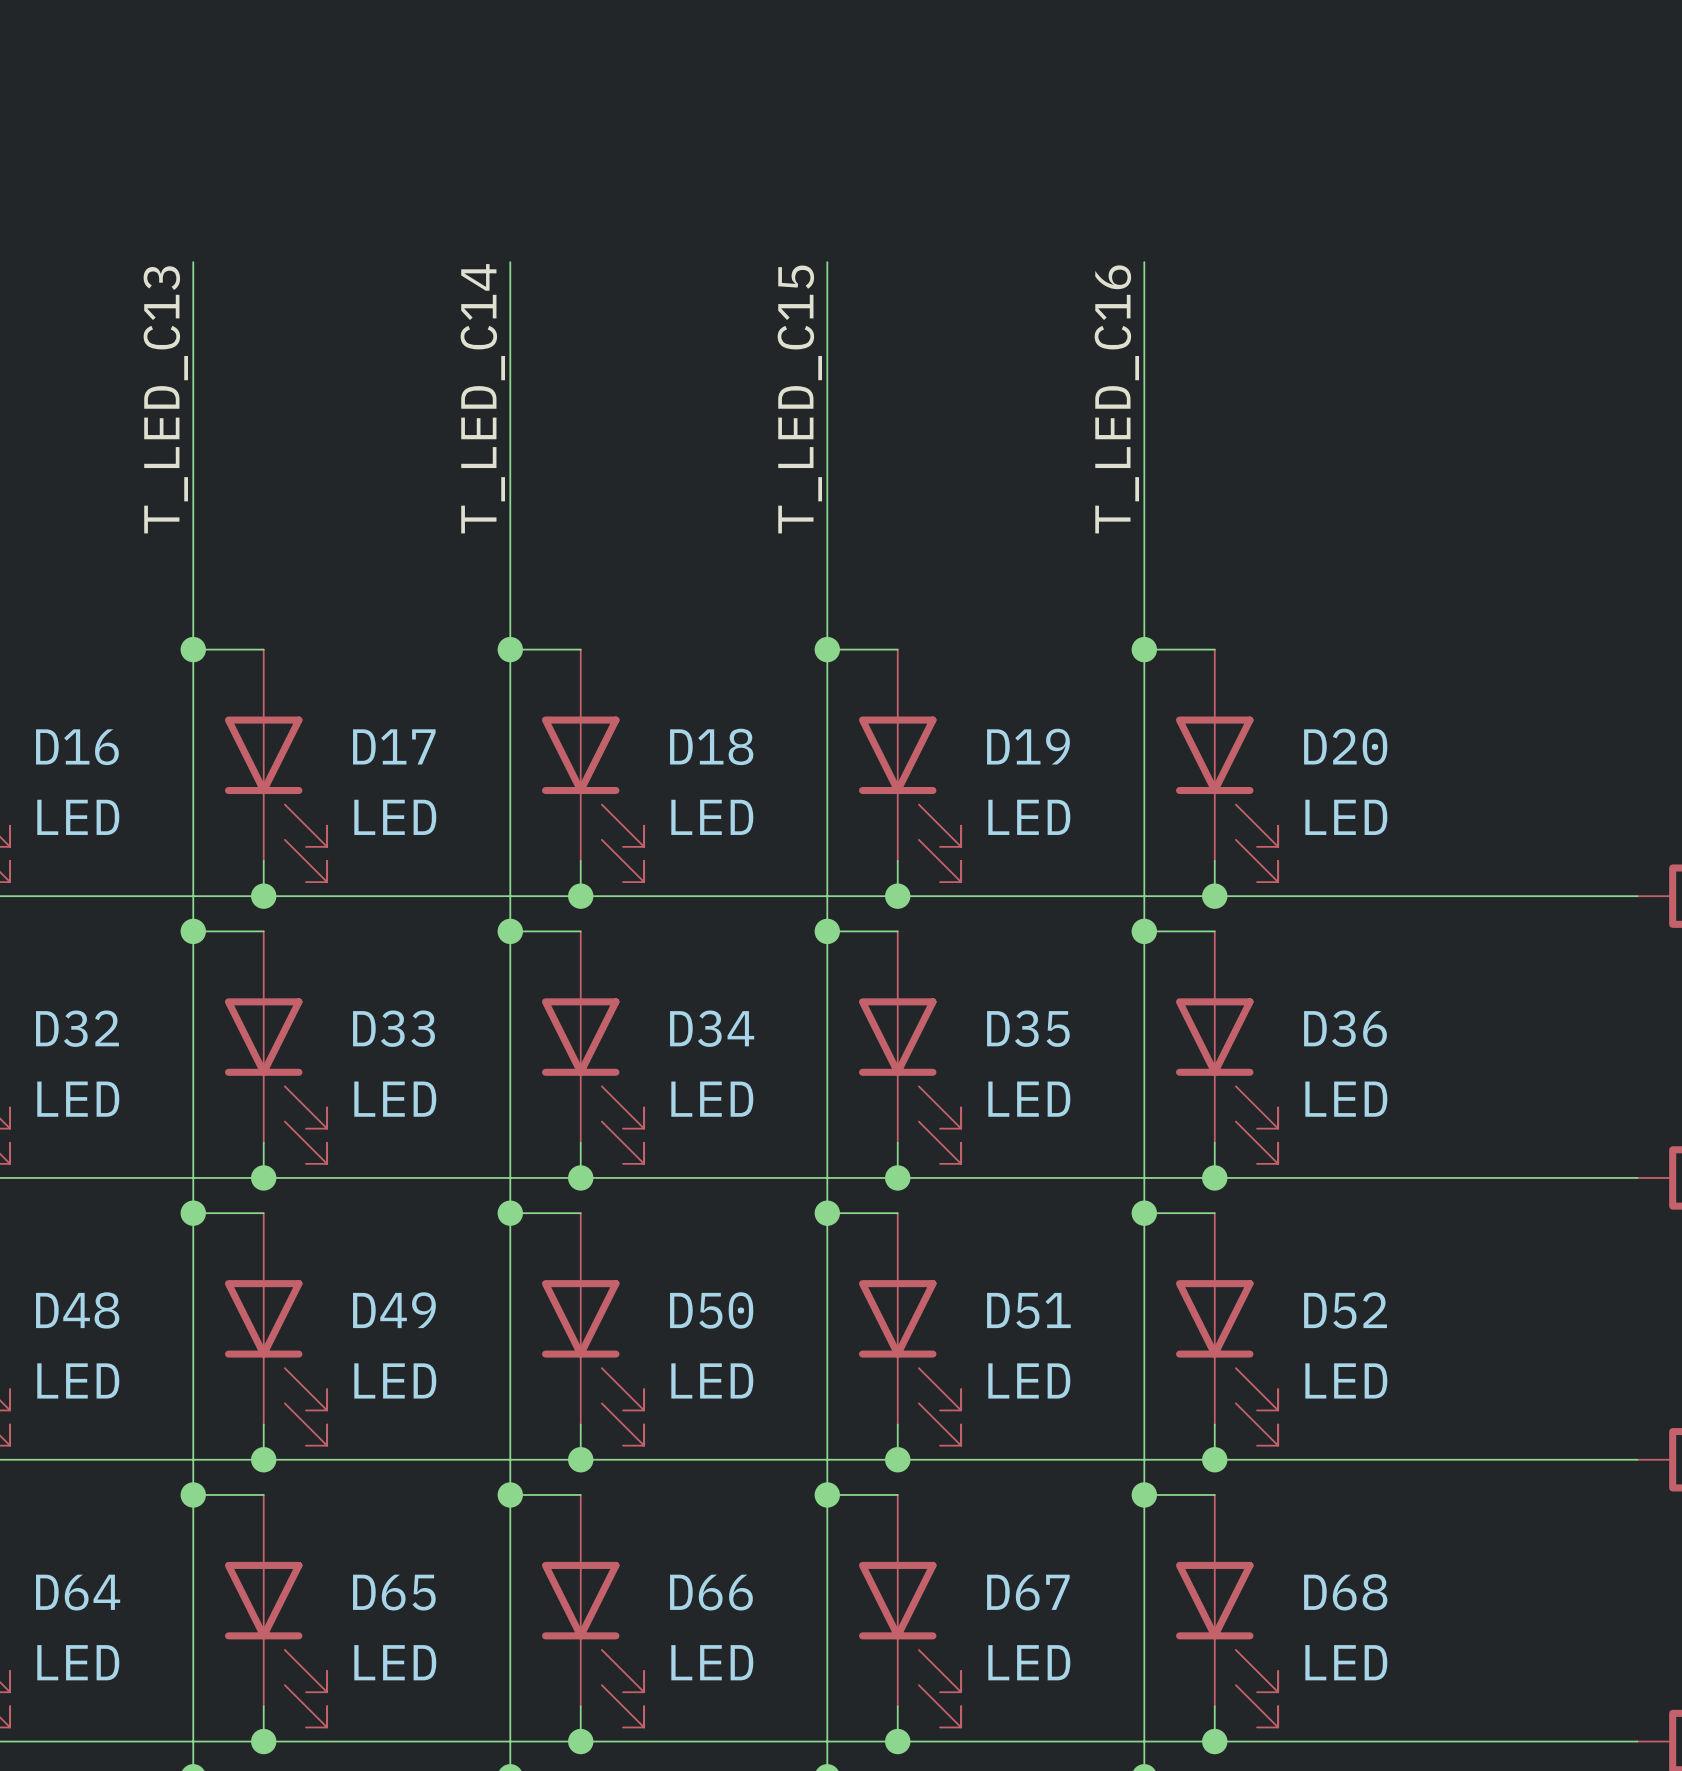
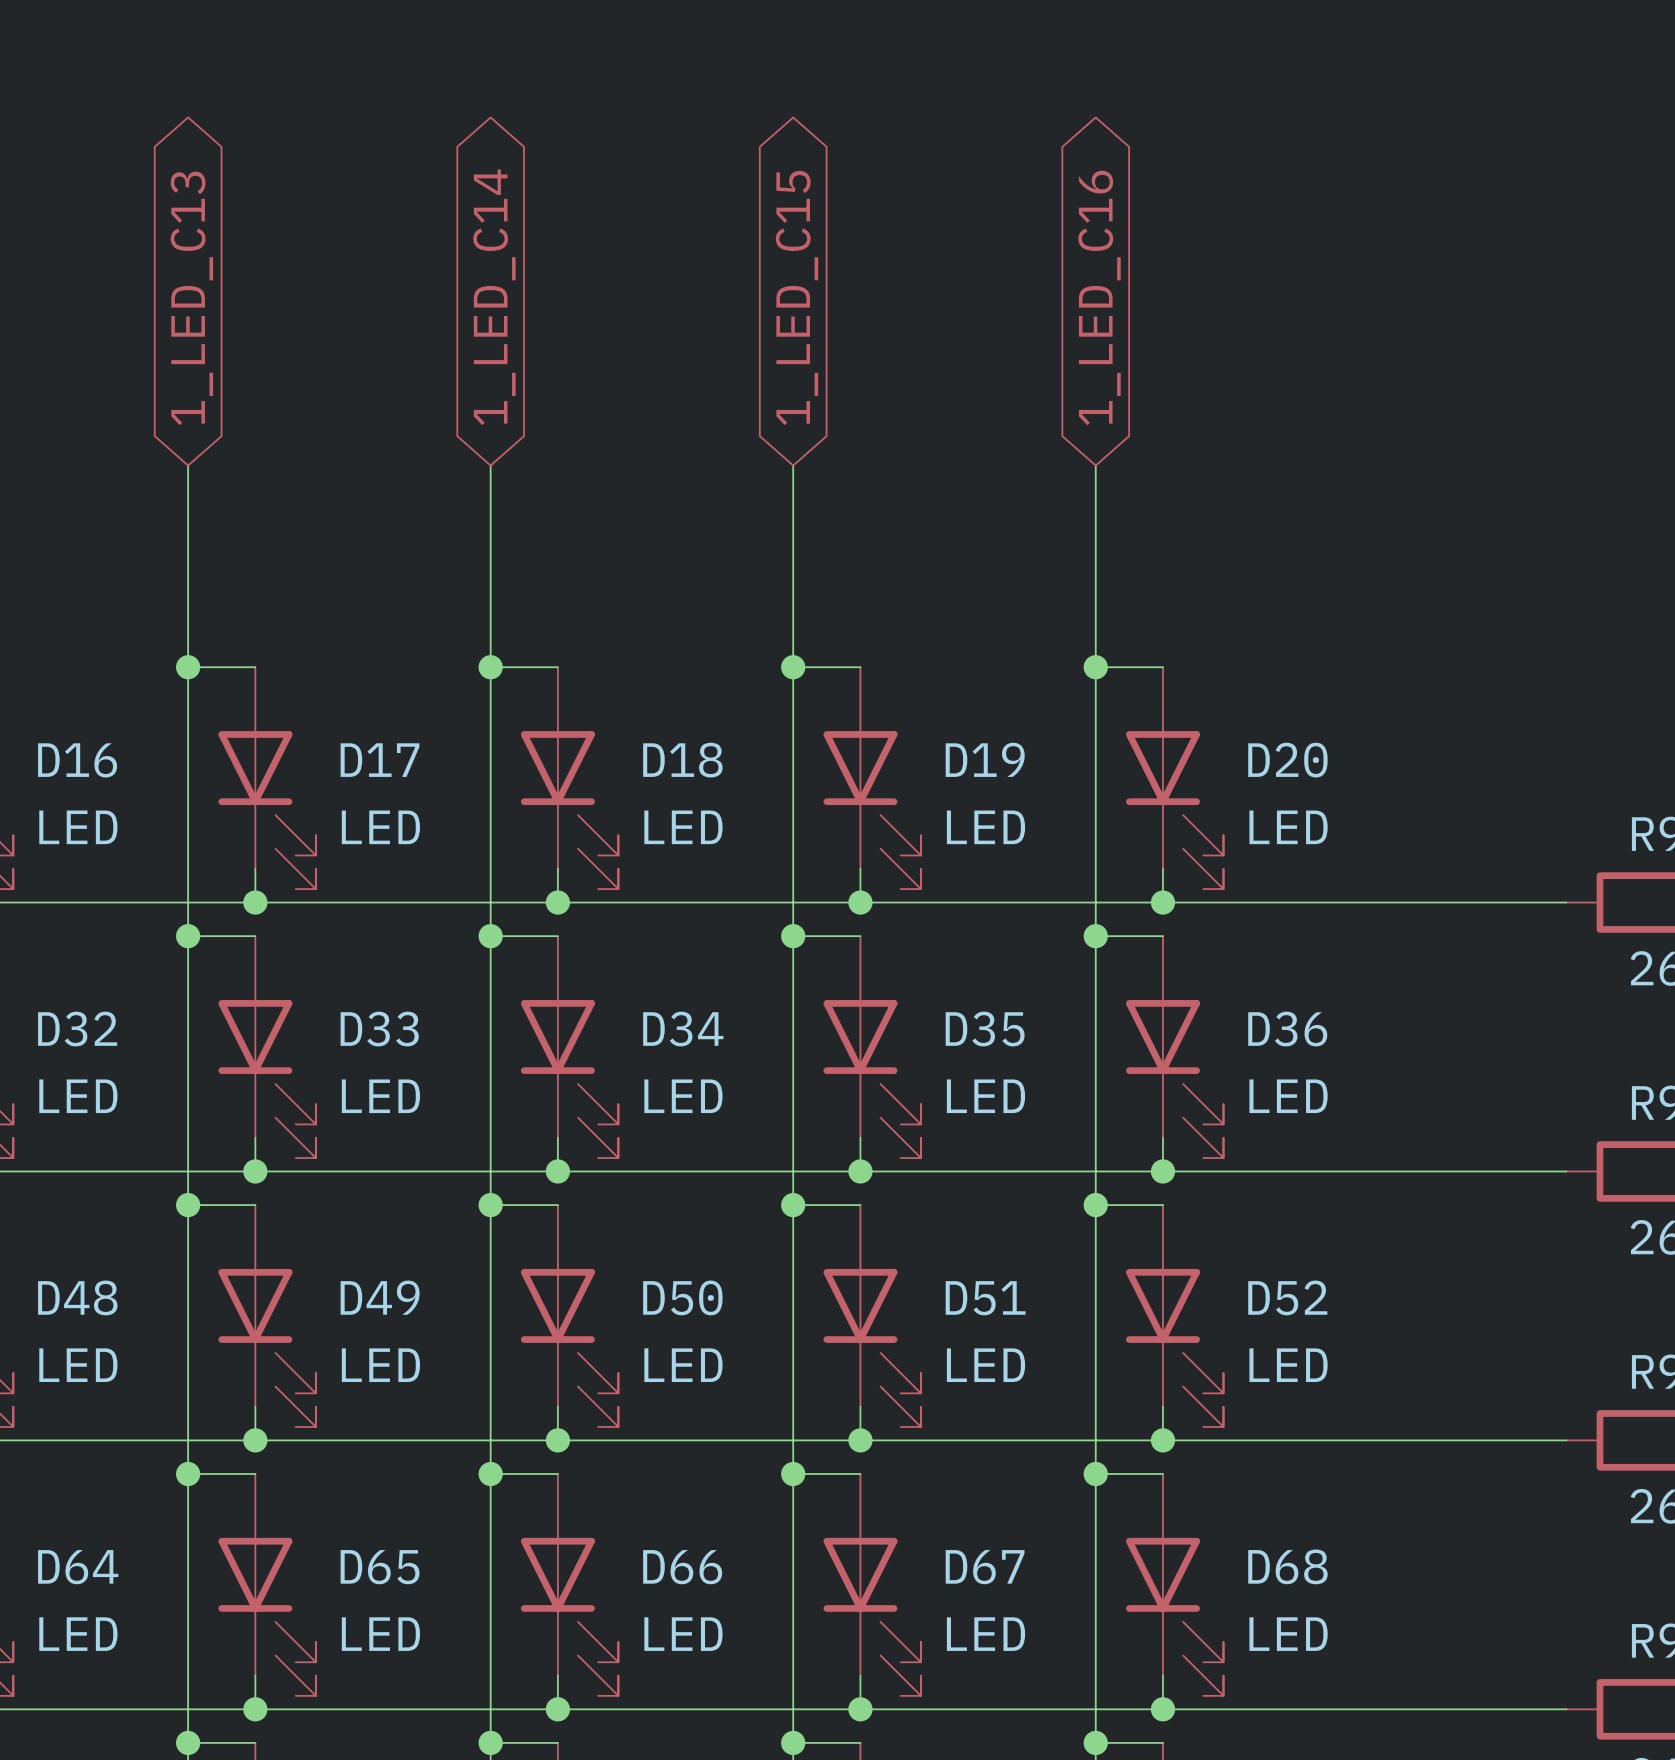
global label: none -> 1_LED_C14 (494, 297)
wire: (193, 262) (193, 438) -> none
wire: (510, 262) (510, 438) -> none
wire: (827, 262) (827, 438) -> none
global label: none -> 1_LED_C15 (796, 298)
wire: (1144, 262) (1144, 438) -> none
global label: none -> 1_LED_C16 (1099, 297)
global label: none -> 1_LED_C13 (191, 298)
label: T_LED_C14 (482, 398) -> none
label: T_LED_C13 (165, 399) -> none
label: T_LED_C15 (799, 399) -> none
label: T_LED_C16 (1116, 399) -> none

